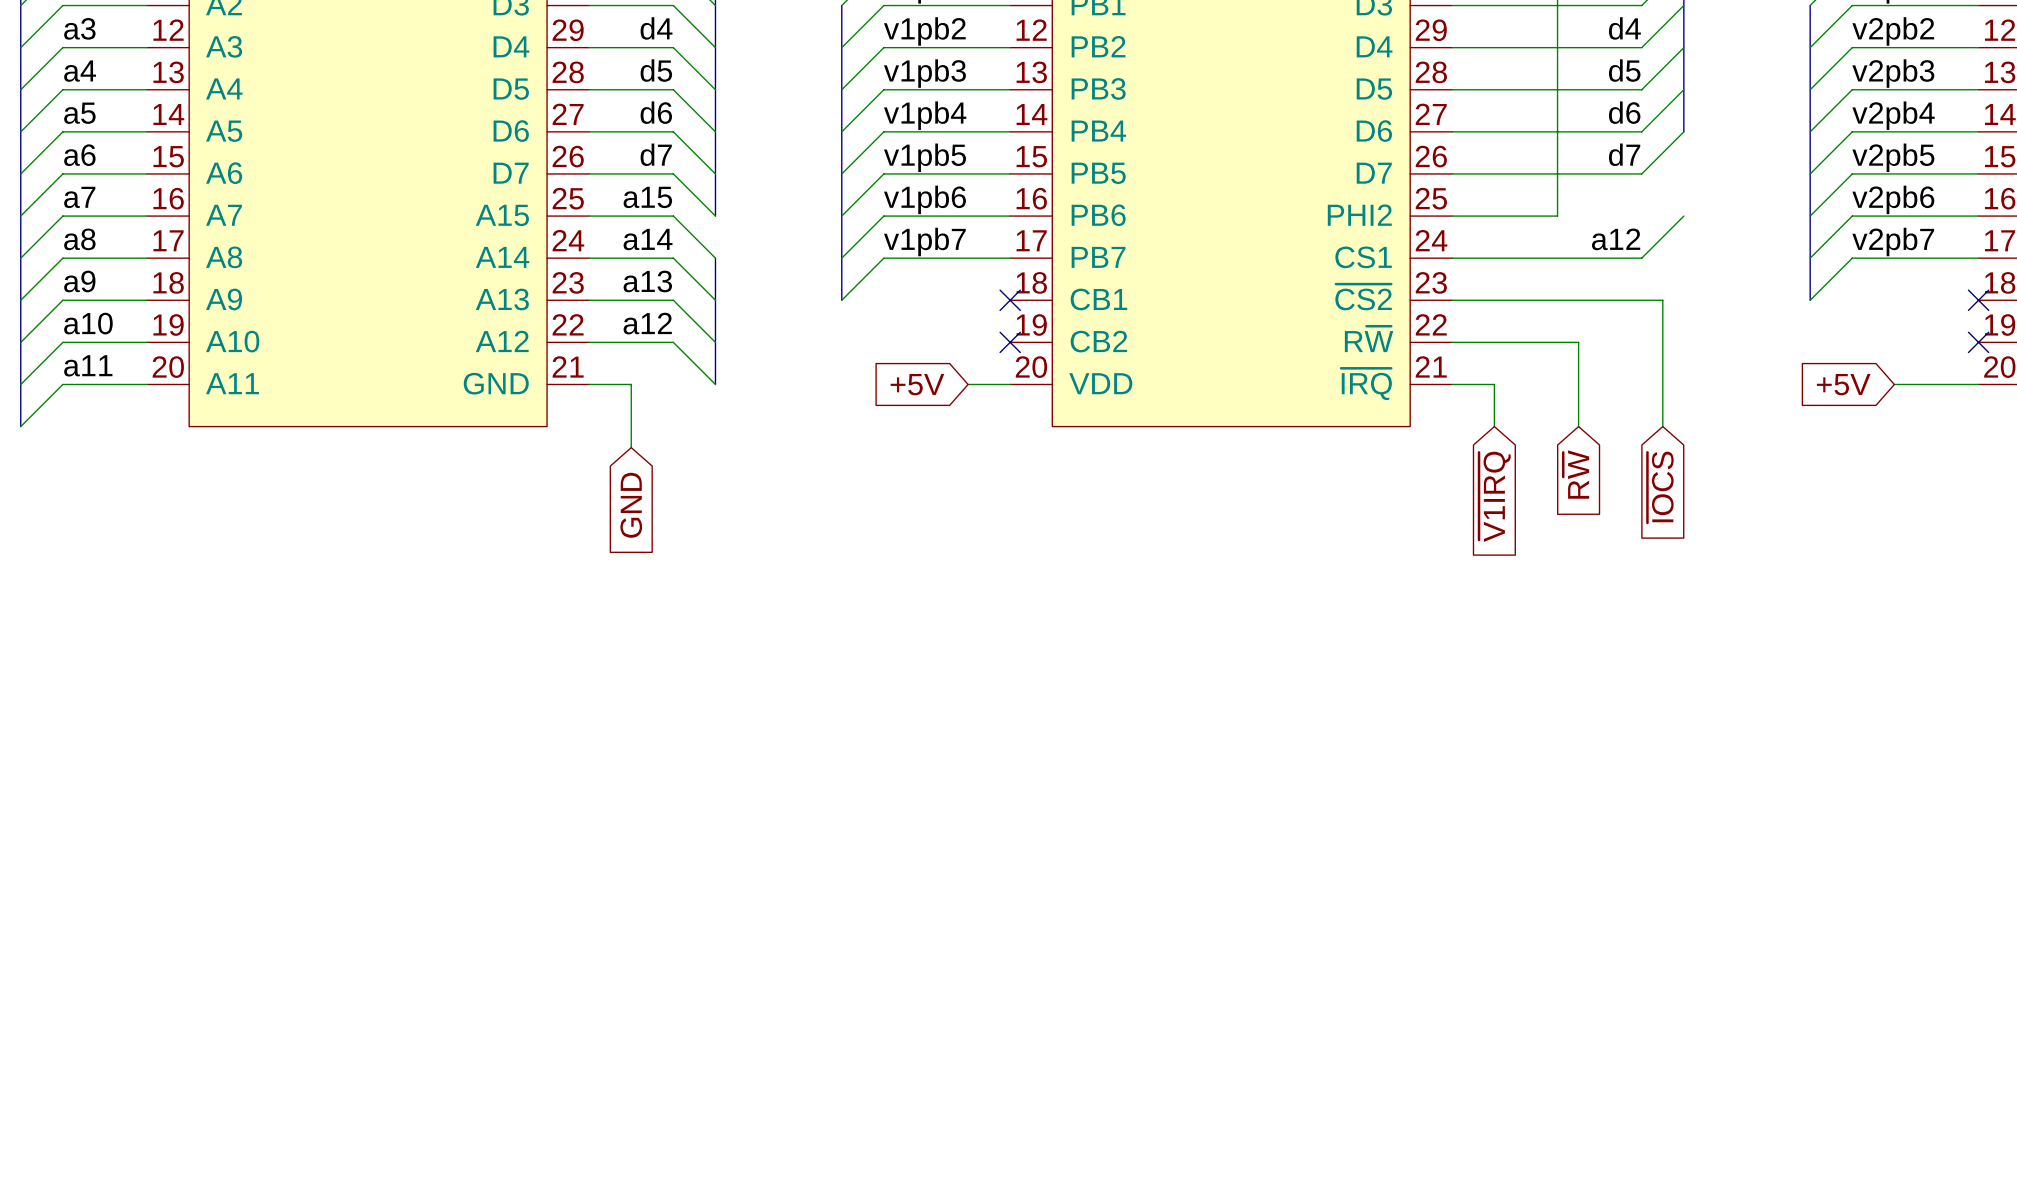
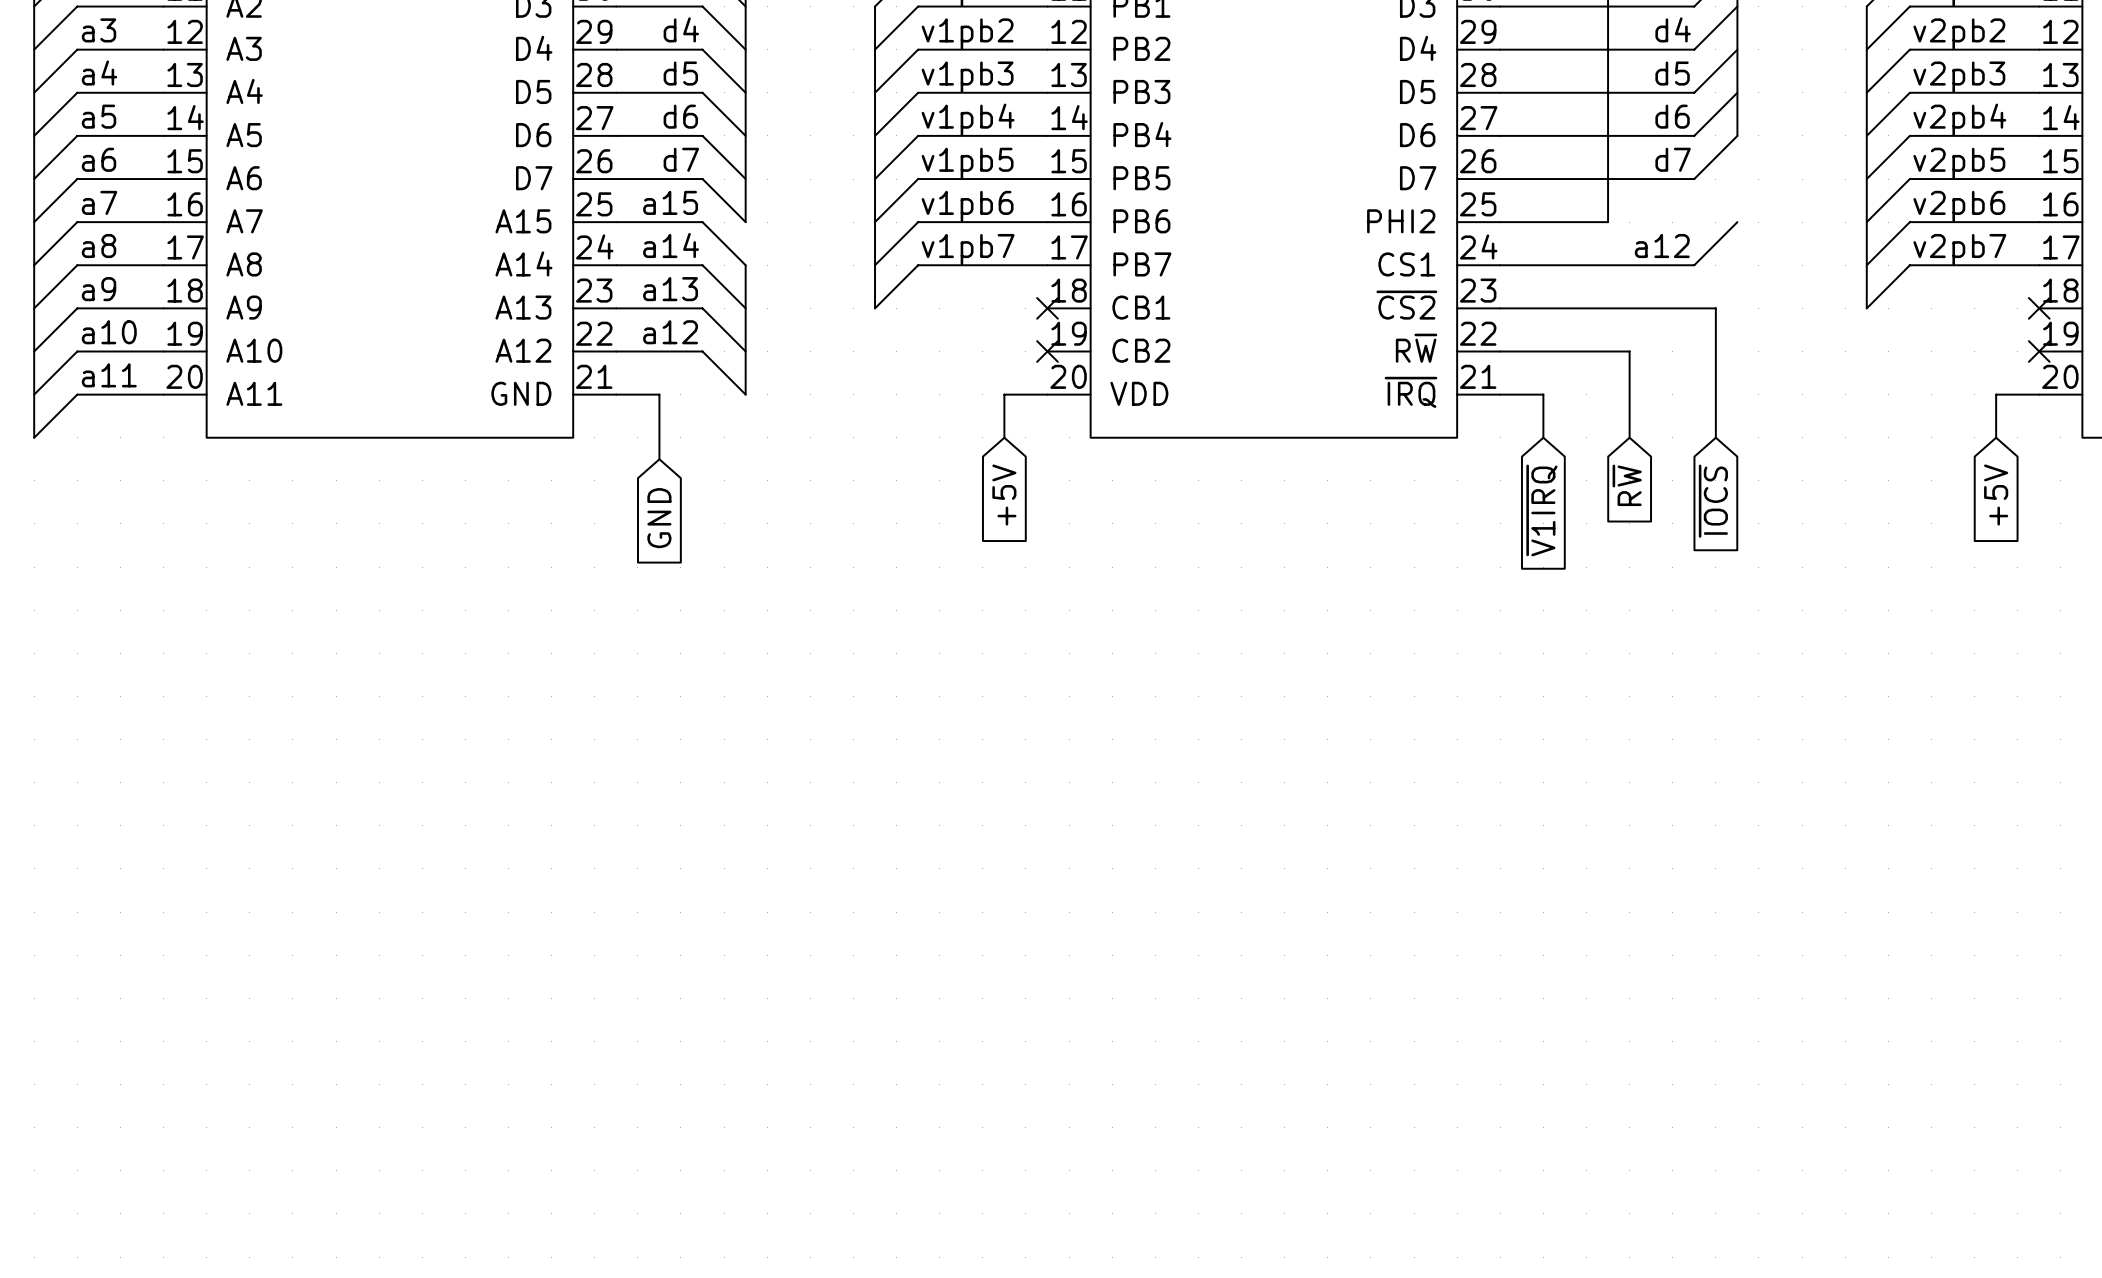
global label rotation: 0° (917, 384) -> 90° counterclockwise (1004, 495)
wire: none -> (1004, 394) (1004, 437)
global label rotation: 0° (1843, 384) -> 90° counterclockwise (1996, 495)
global label position: +5V (1843, 384) -> +5V (1996, 495)
wire: (1894, 384) (1936, 384) -> (1996, 437) (1996, 394)

